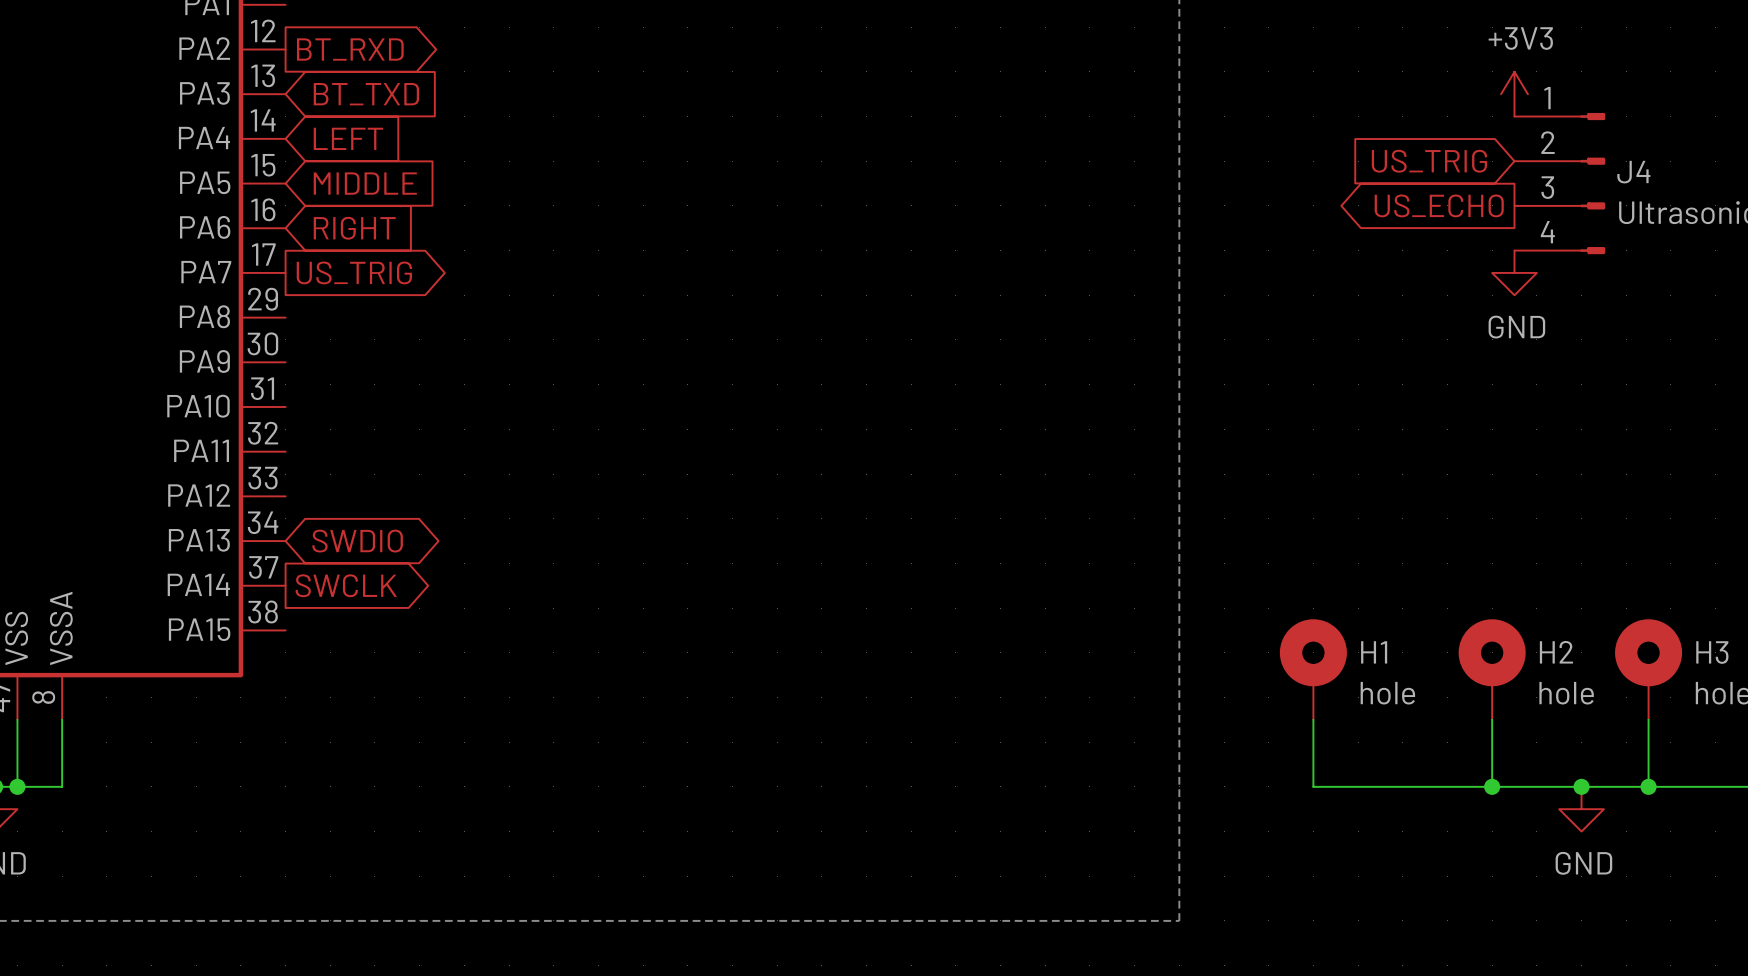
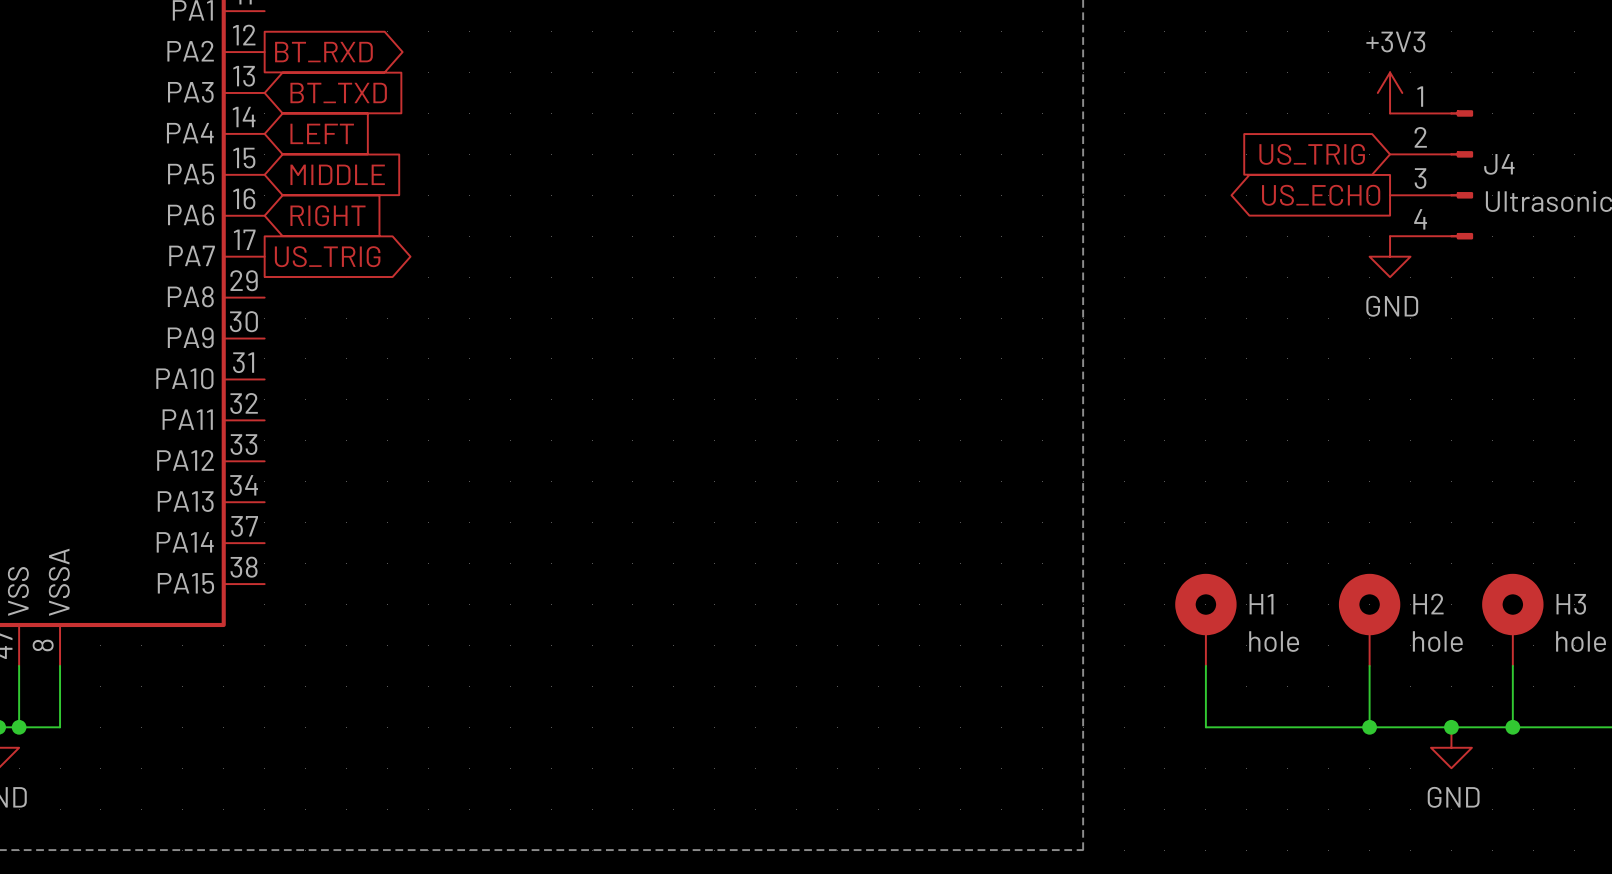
global label: SWDIO (357, 541) -> none
global label: SWCLK (346, 585) -> none

